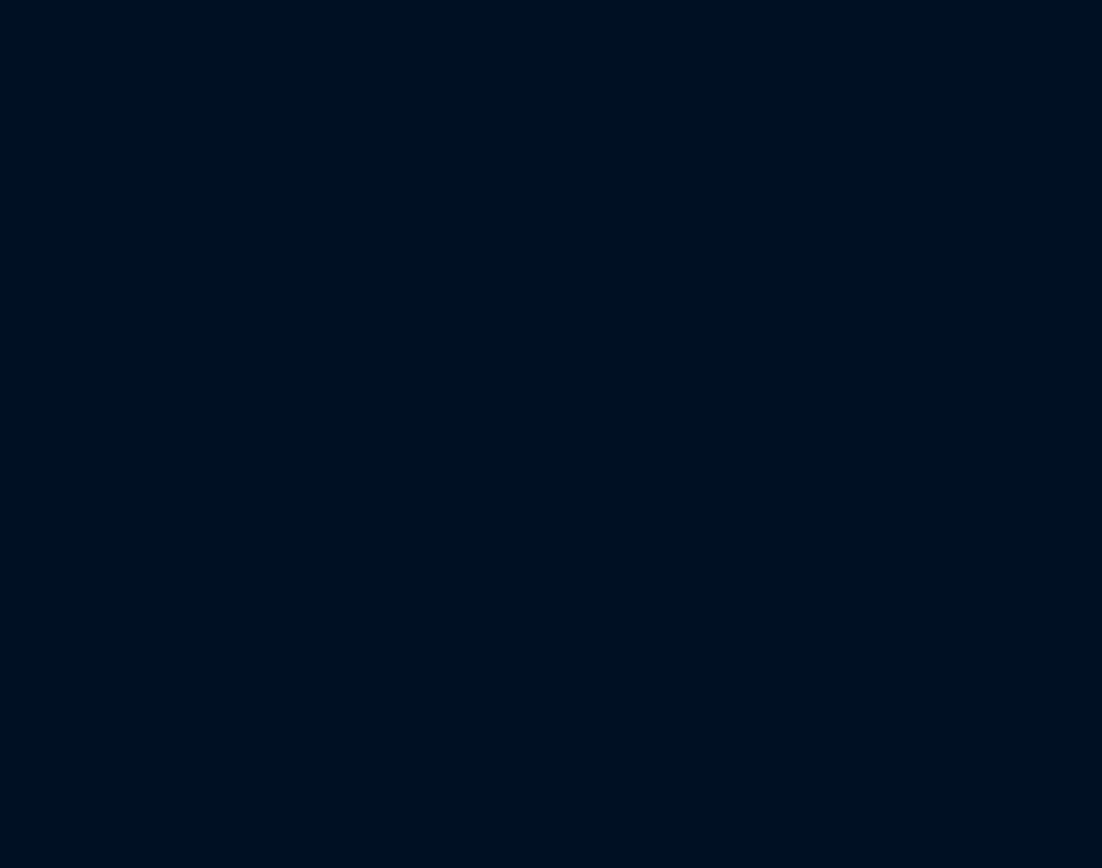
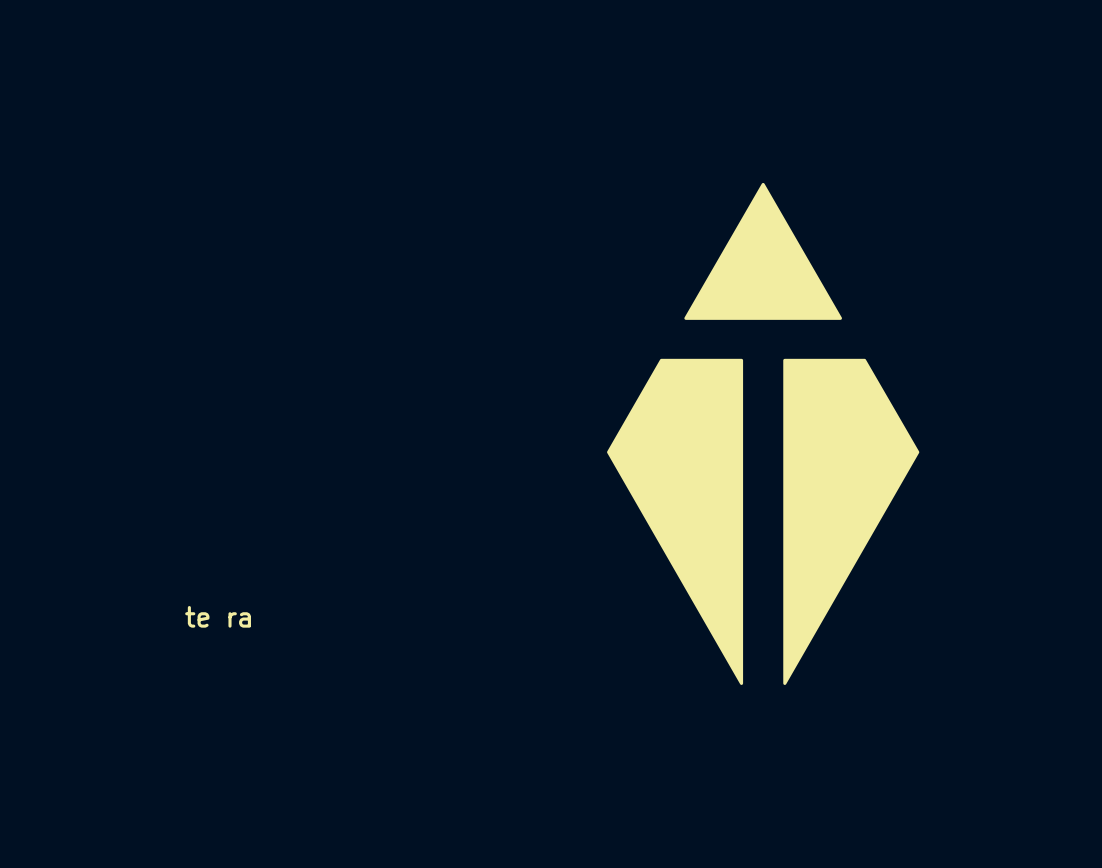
drawing: none -> [607, 182, 920, 685]

